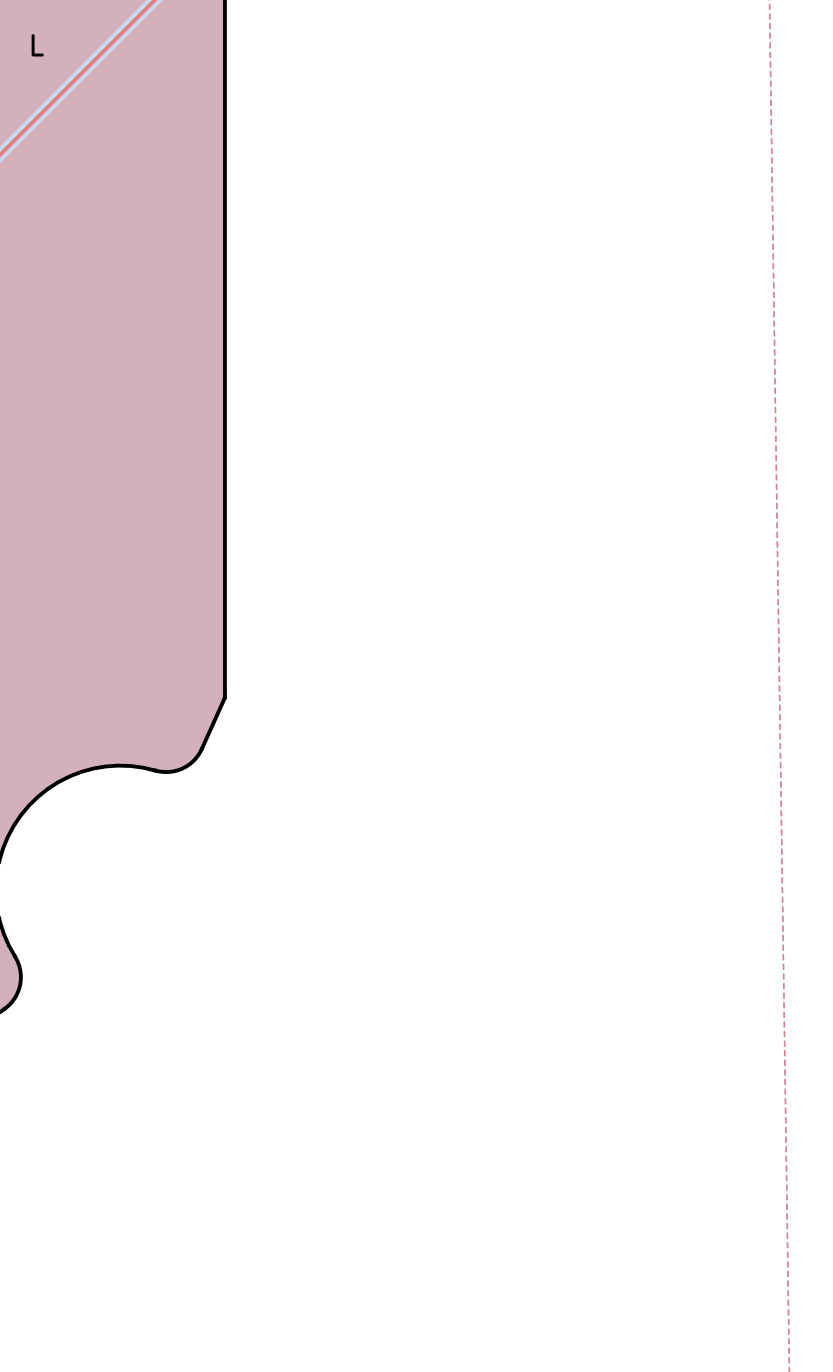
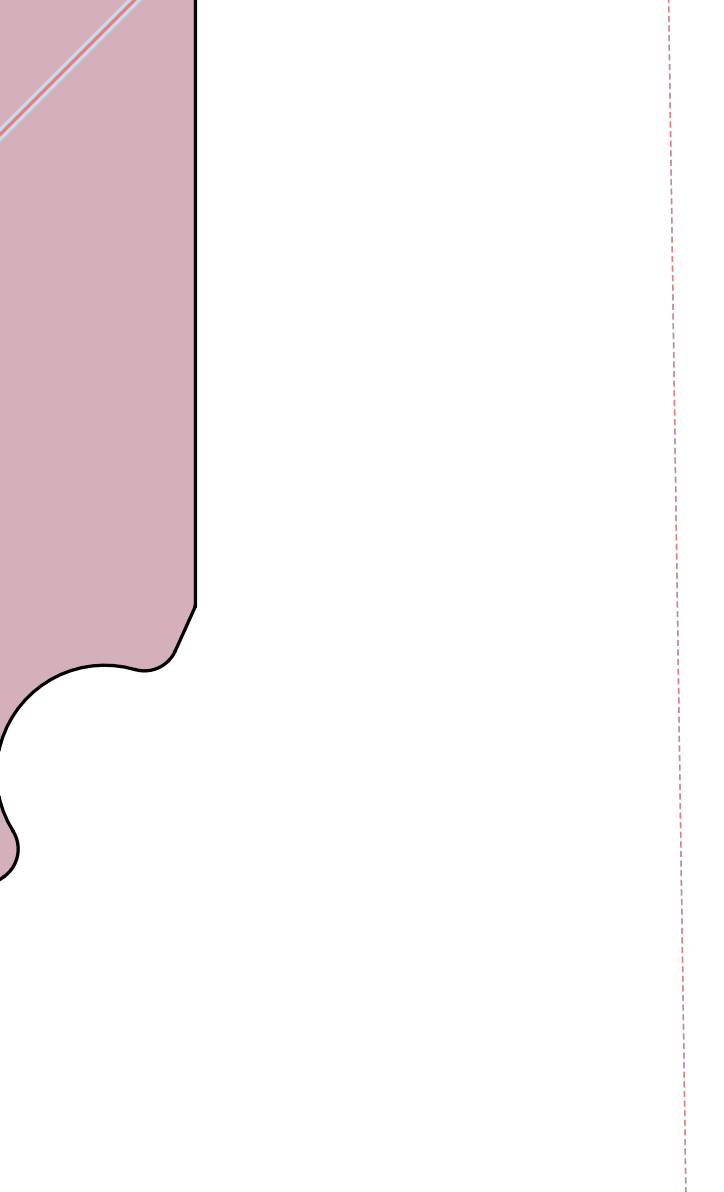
text: L (37, 45) -> none

